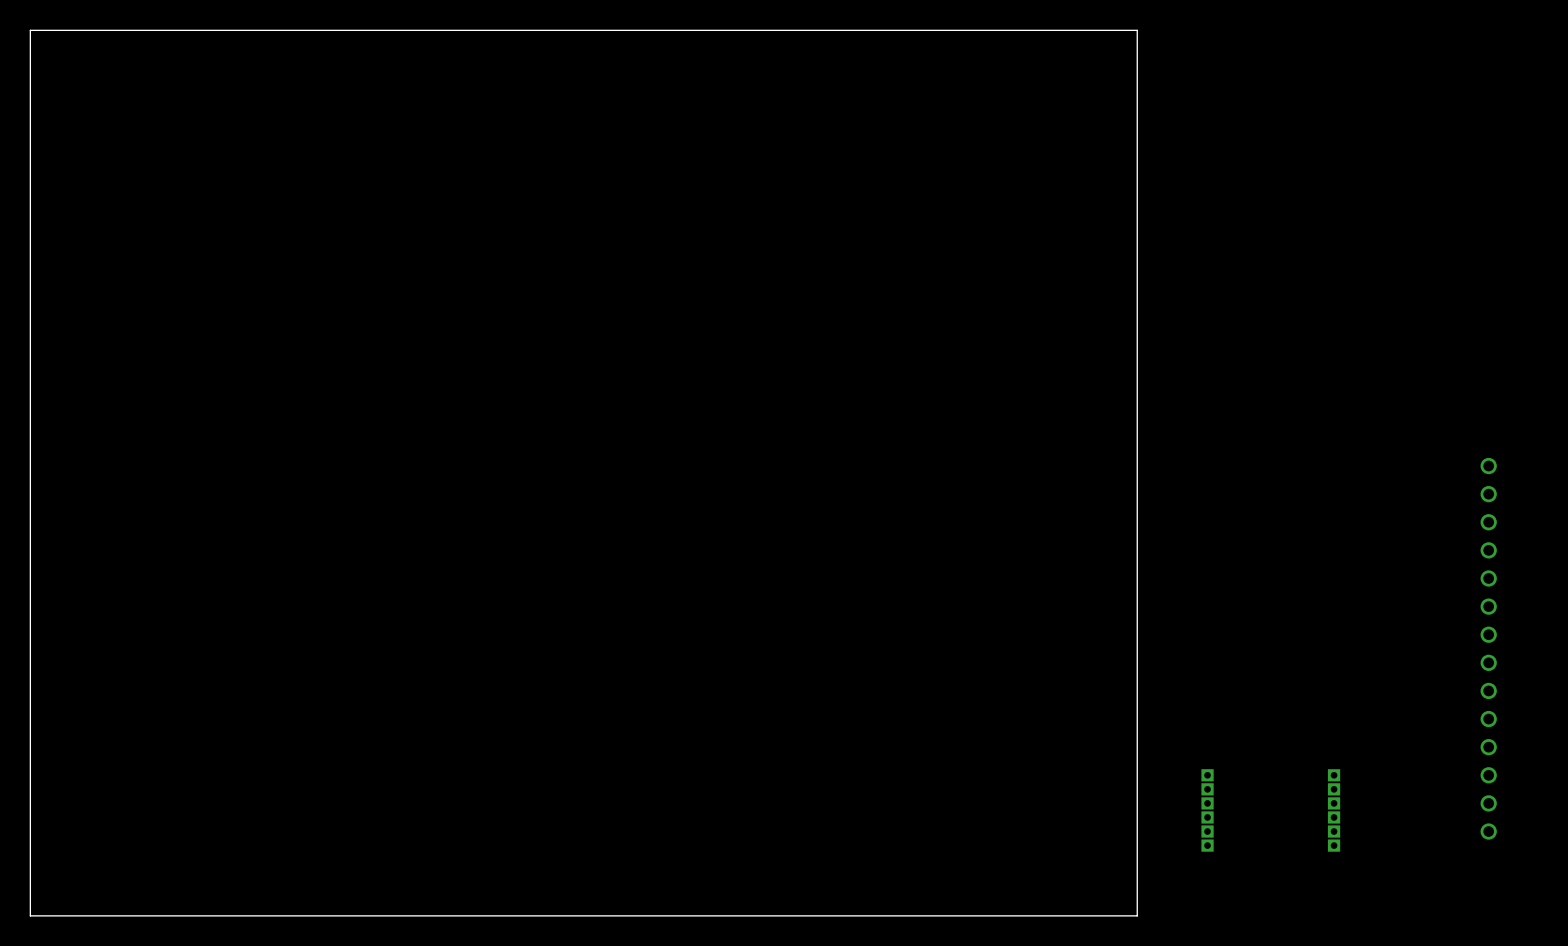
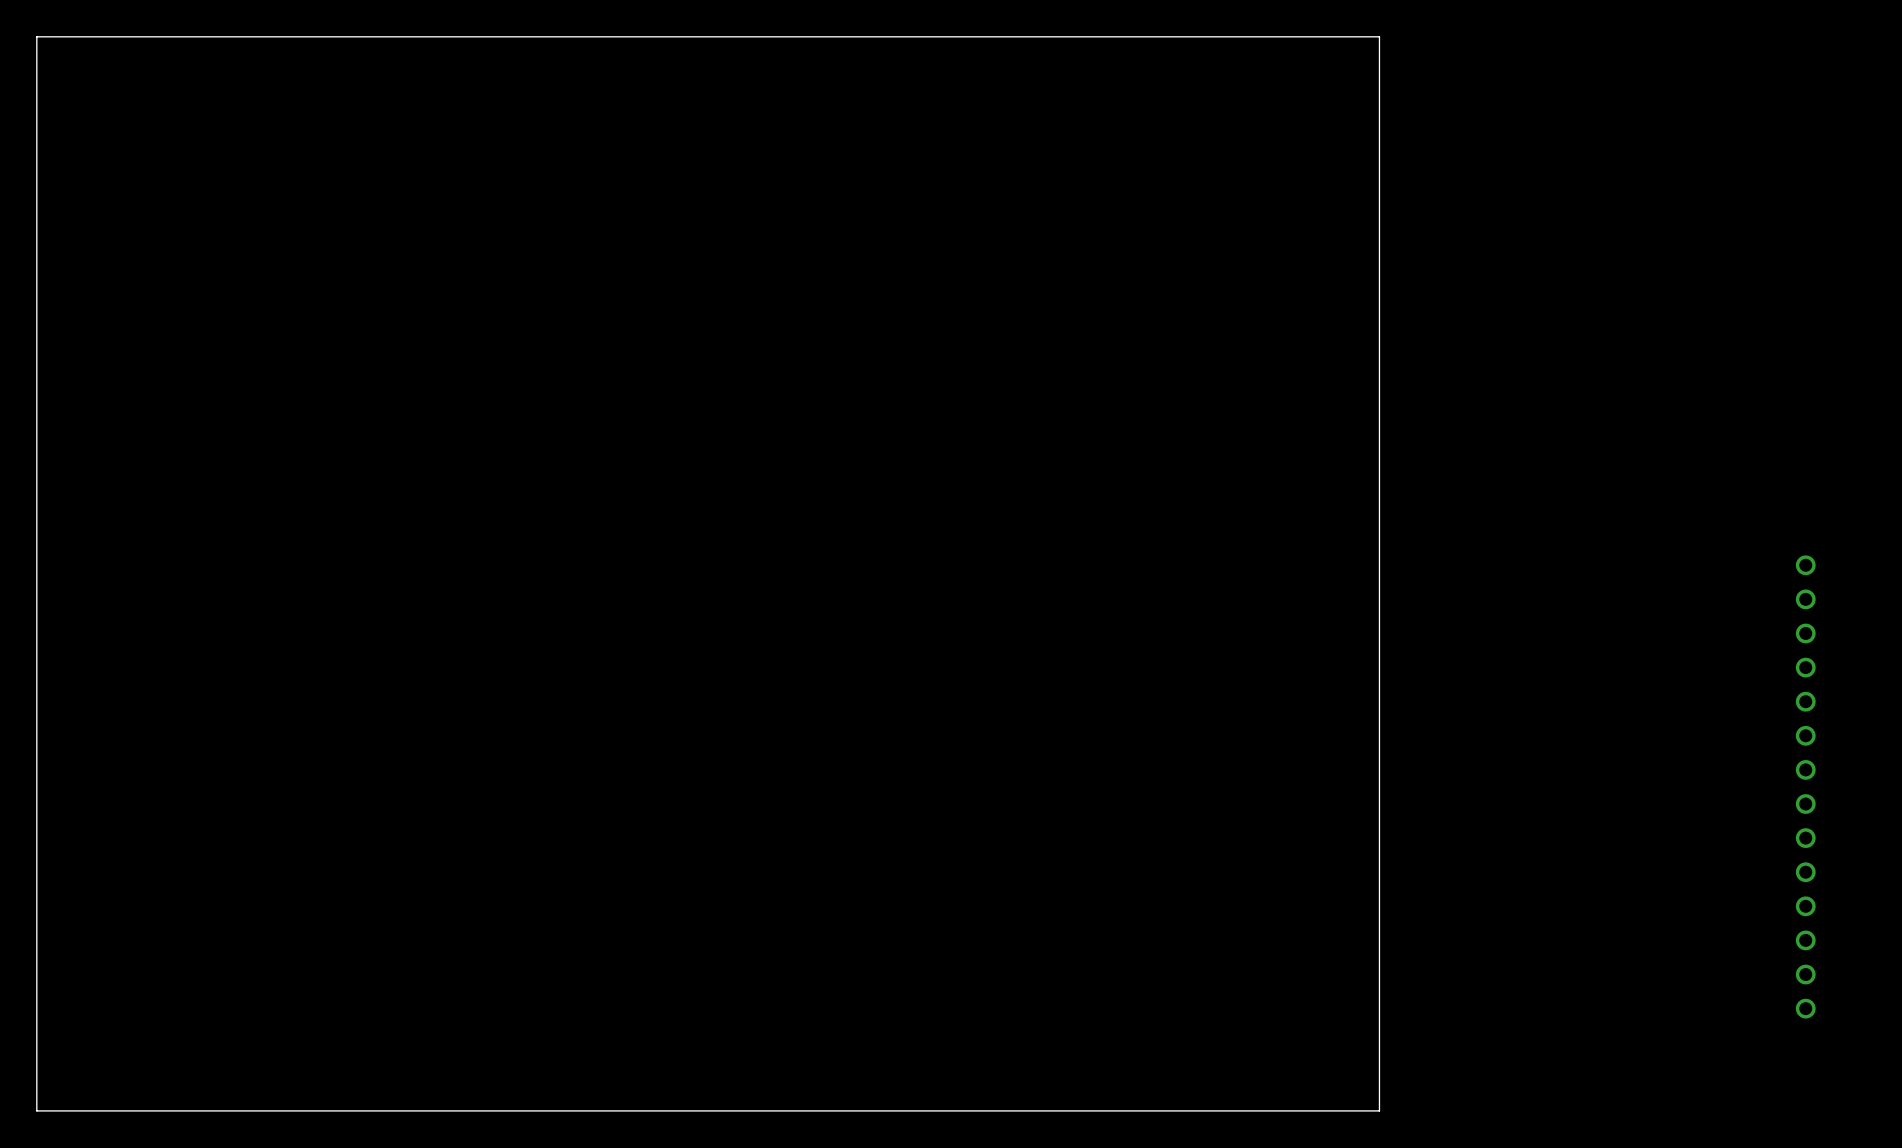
part: (1207, 810) -> none
part: (1334, 810) -> none

